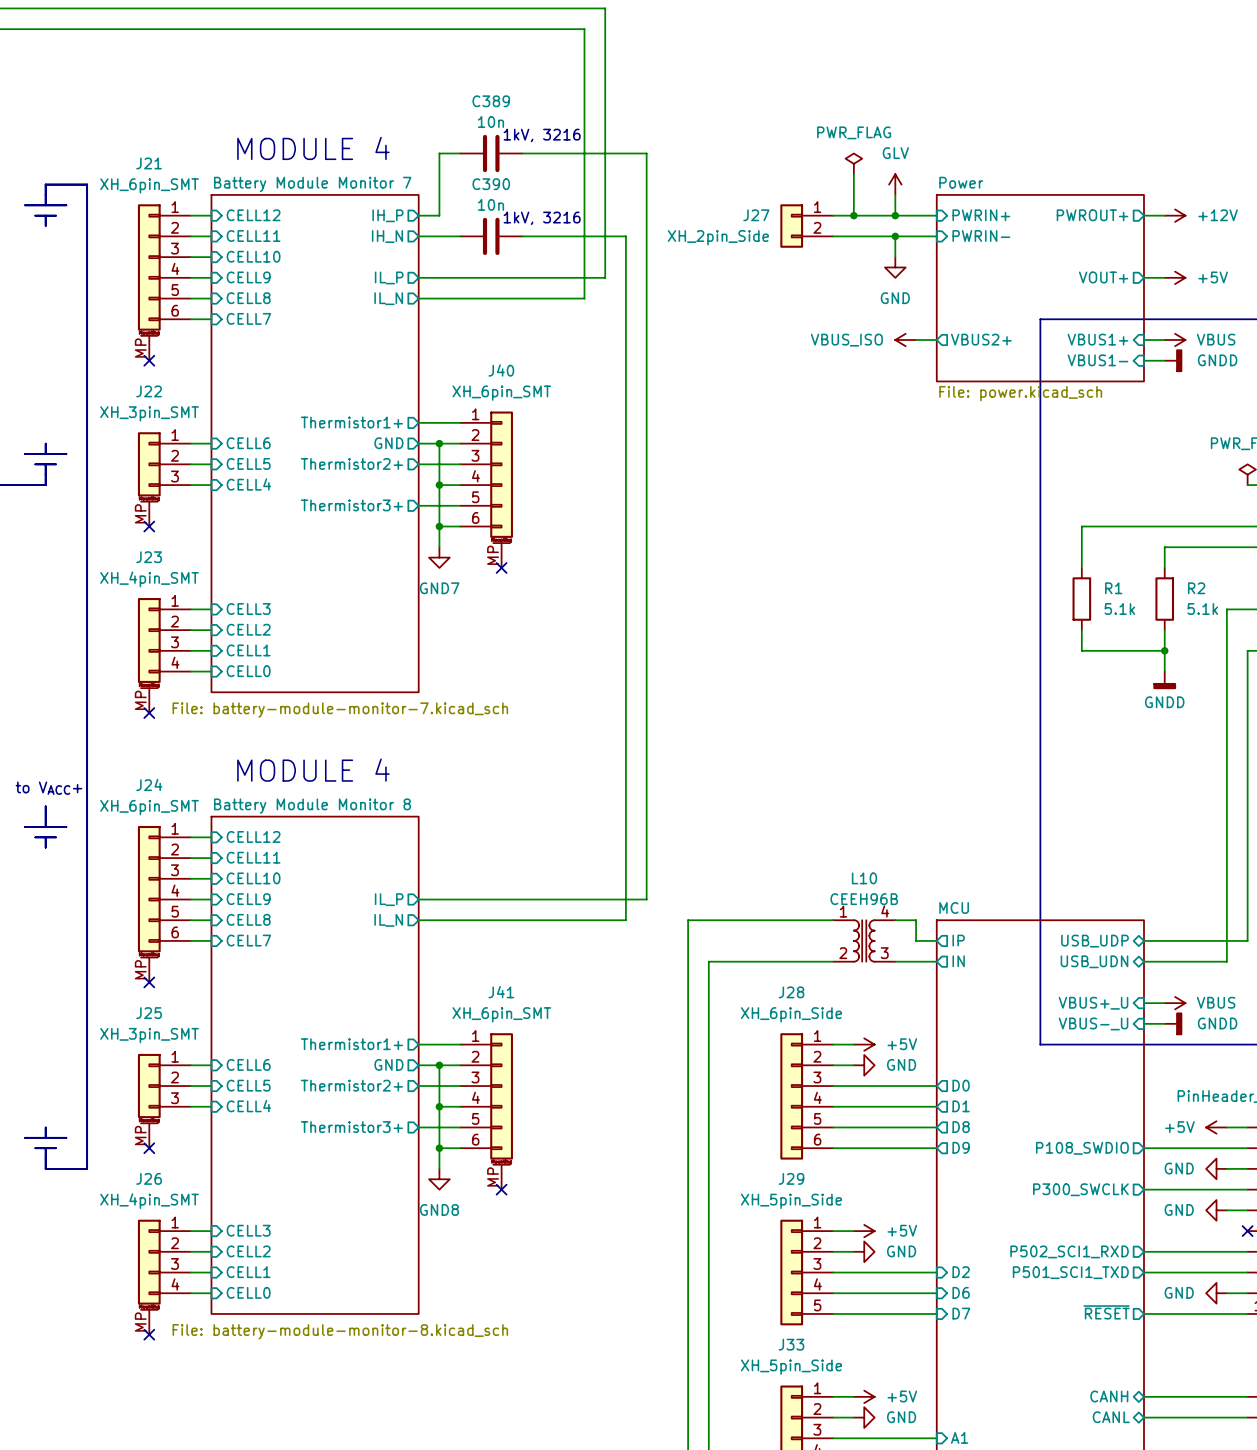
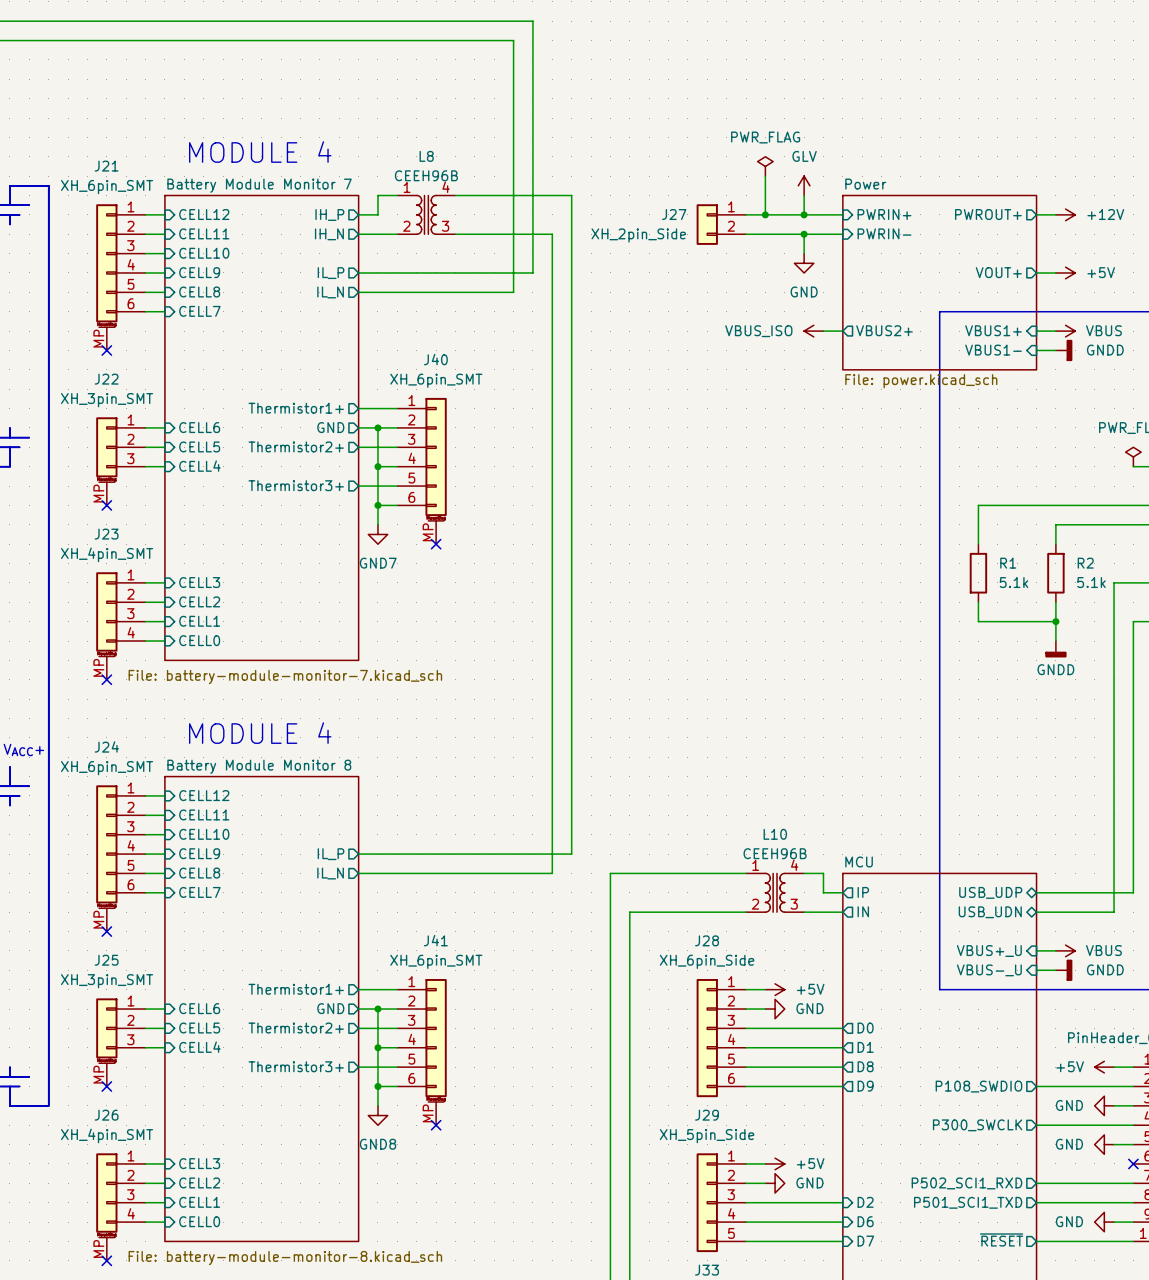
text: 1kV, 3216 (542, 135) -> none
wire: (460, 153) (439, 153) (439, 194) -> (397, 195) (377, 195)
C389: 10n (491, 153) -> none
wire: (522, 153) (646, 153) (646, 194) -> (455, 195) (571, 195)
L8: none -> CEEH96B (426, 214)
text: 1kV, 3216 (542, 218) -> none
C390: 10n (491, 236) -> none

